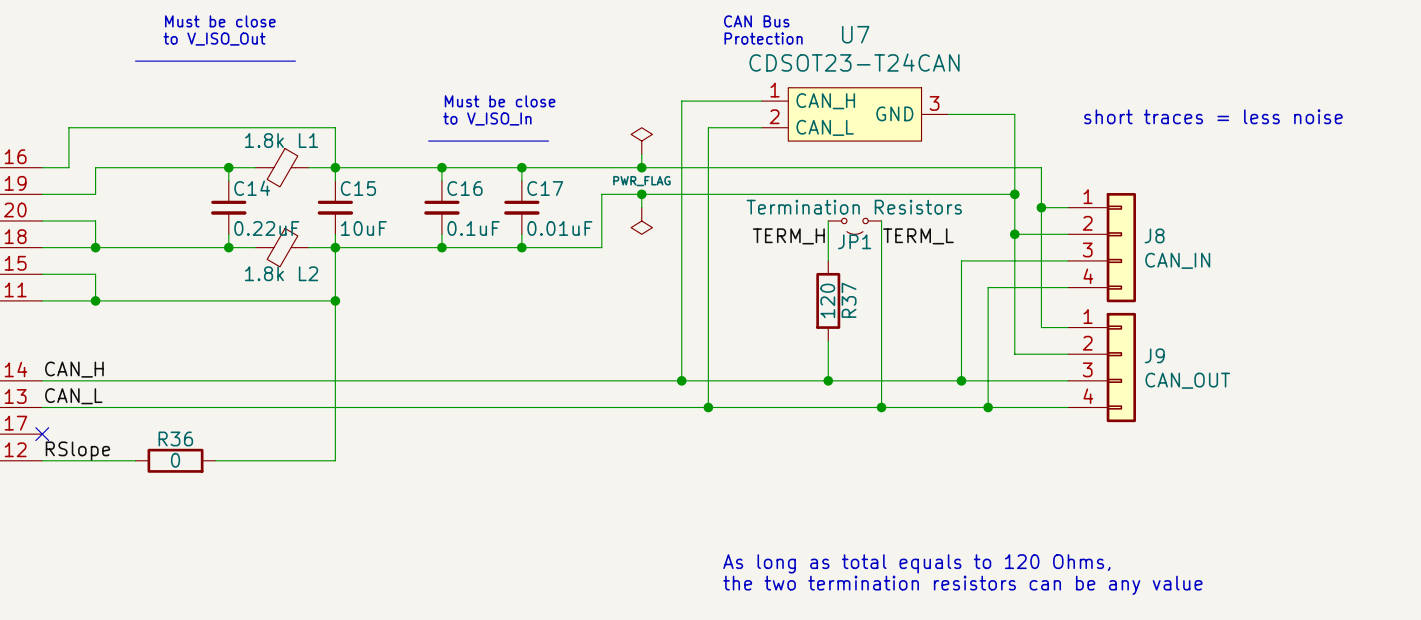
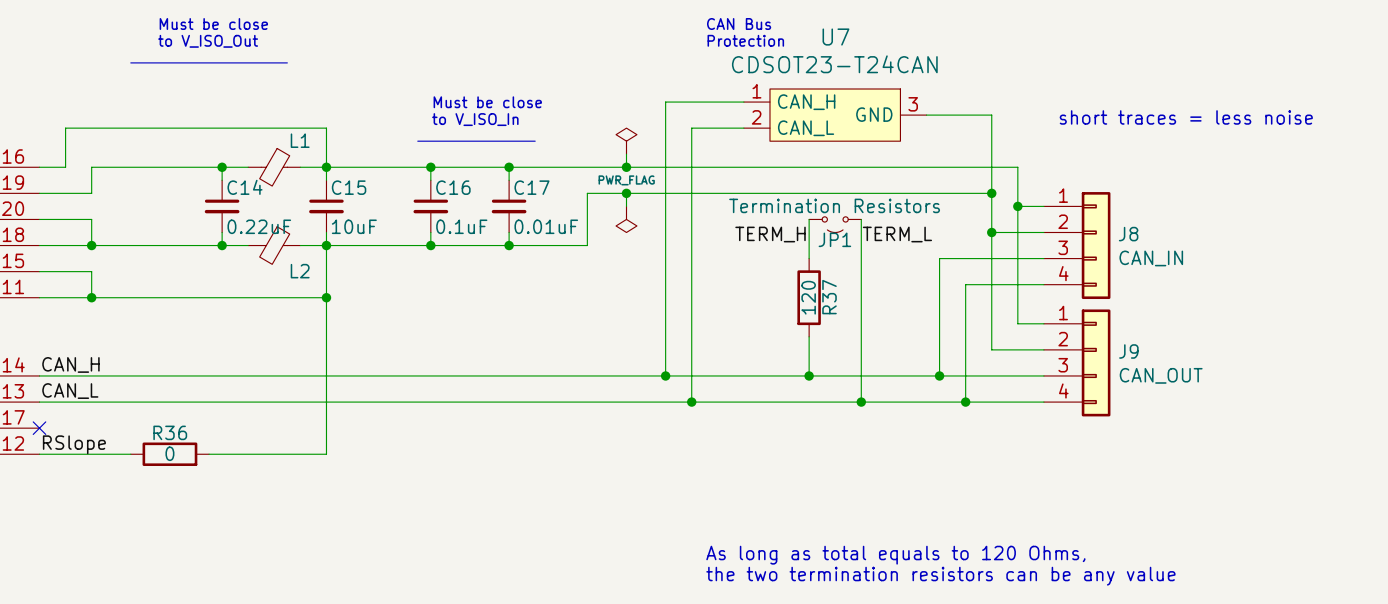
L1 value: 1.8k (264, 140) -> none
L2 value: 1.8k (264, 273) -> none

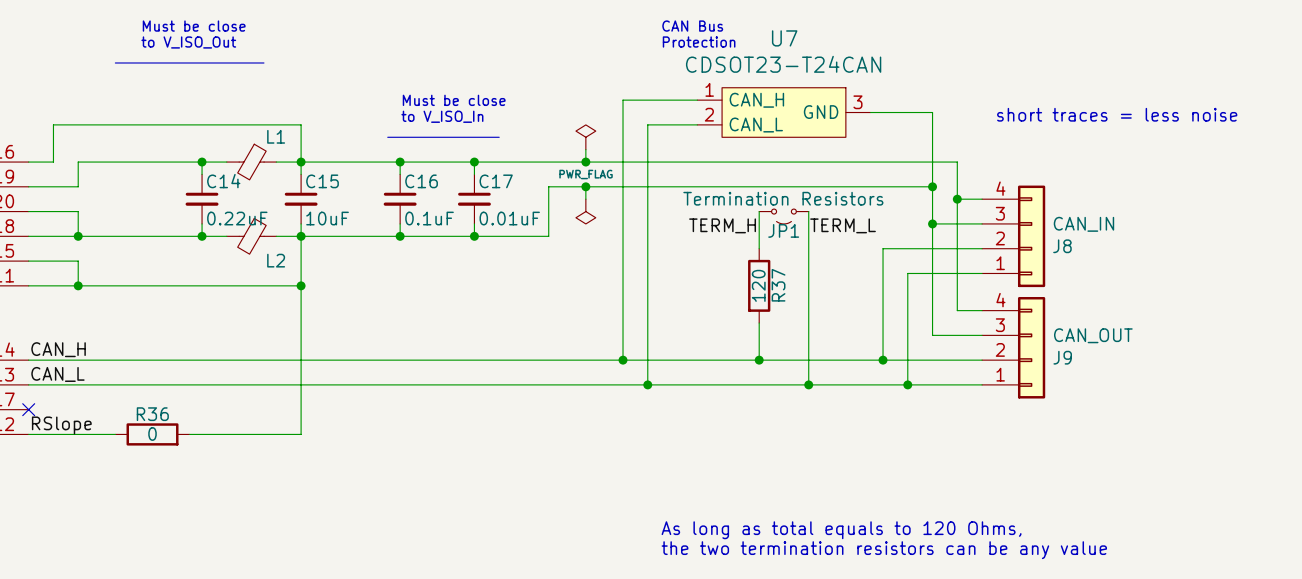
J8 flip: as is (1096, 245) -> up-down (1031, 236)
J9 flip: as is (1096, 362) -> up-down (1031, 347)

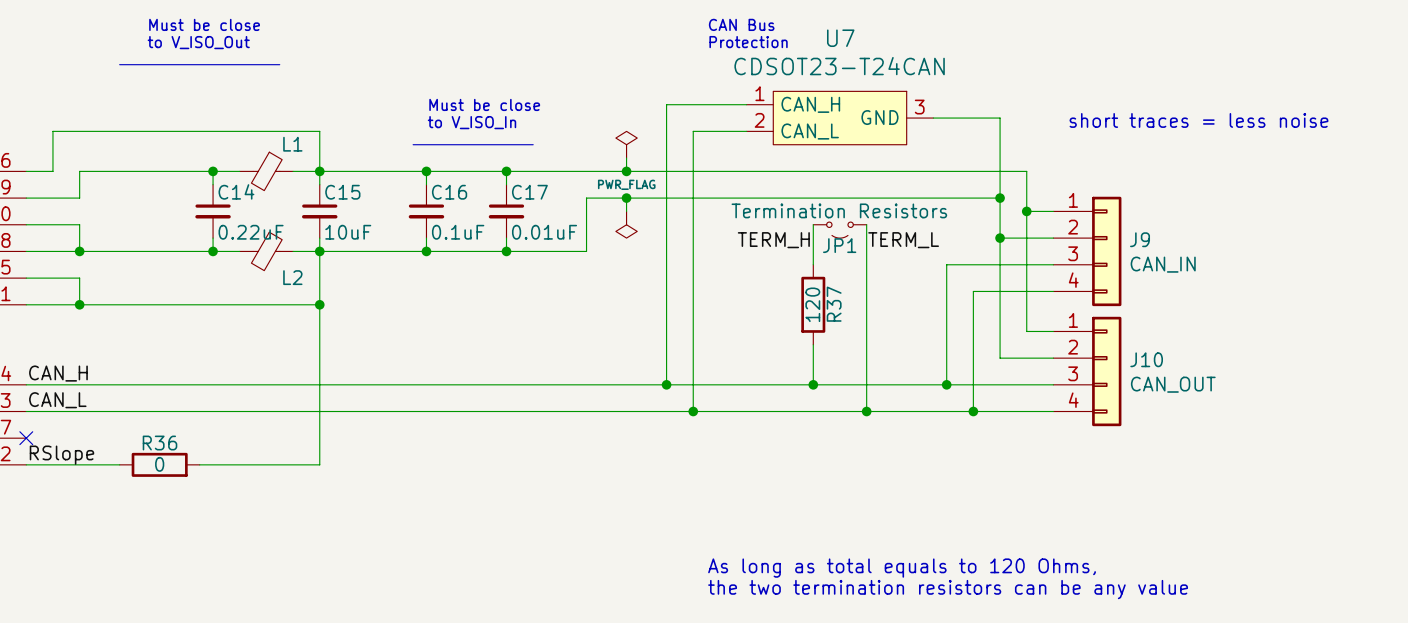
J8: CAN_IN (1013, 236) -> none
J9 value: CAN_OUT (1093, 335) -> CAN_IN (1163, 264)
J9 position: (1013, 347) -> (1087, 251)
J10: none -> CAN_OUT (1087, 371)
J9 flip: as is (1031, 347) -> up-down (1106, 251)

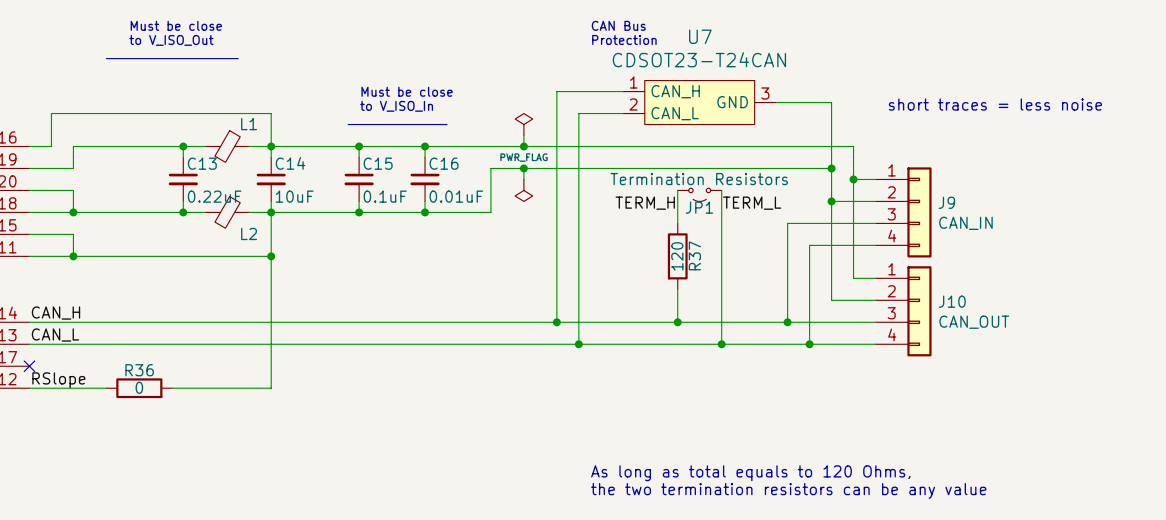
C14 name: C14 (236, 191) -> C13 (202, 163)
C15 name: C15 (342, 192) -> C14 (290, 163)
C16 name: C16 (449, 192) -> C15 (378, 163)
C17 name: C17 (529, 192) -> C16 (444, 163)

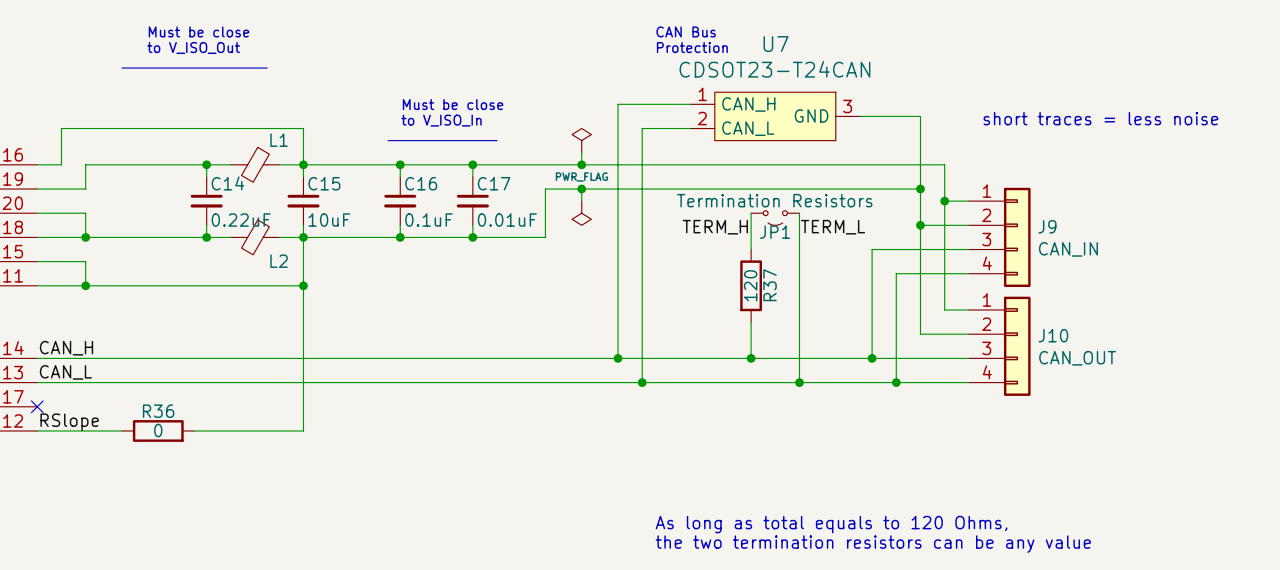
C13 name: C13 (202, 163) -> C14 (227, 183)
C14 name: C14 (290, 163) -> C15 (324, 183)
C15 name: C15 (378, 163) -> C16 (421, 183)
C16 name: C16 (444, 163) -> C17 (494, 183)

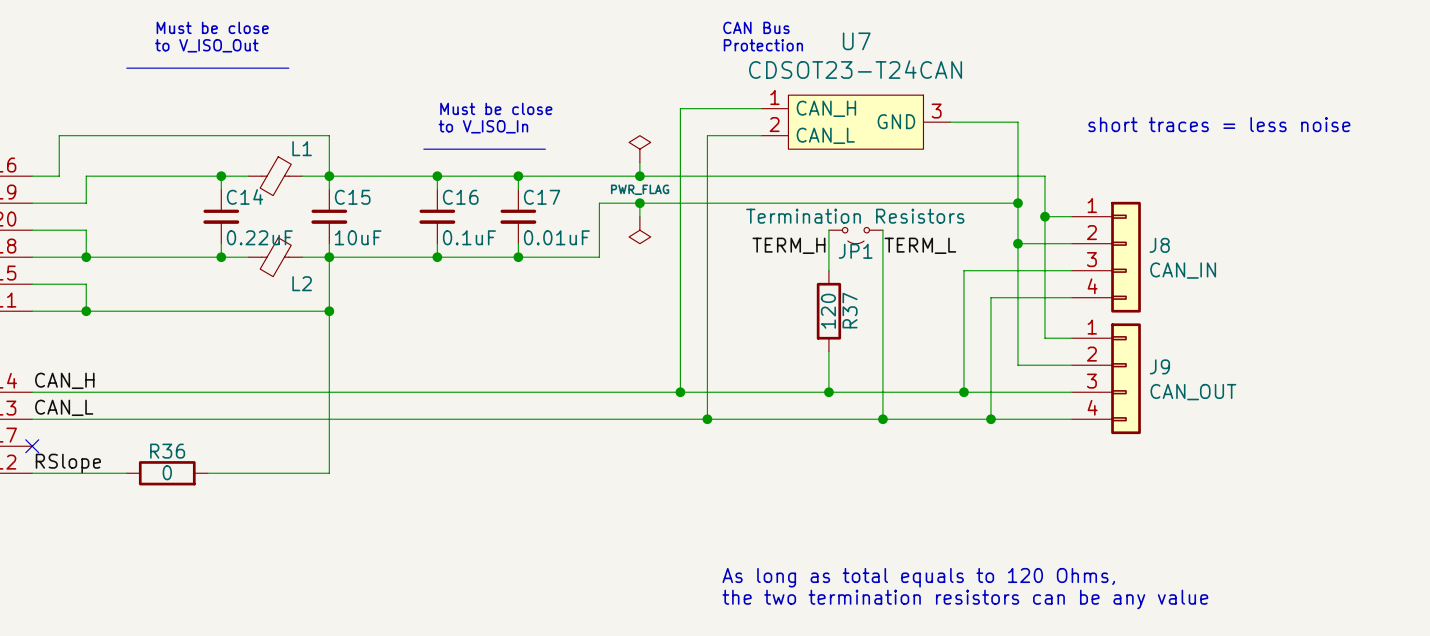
J9 name: J9 (1047, 226) -> J8 (1159, 245)
J10 name: J10 (1053, 335) -> J9 (1159, 366)

